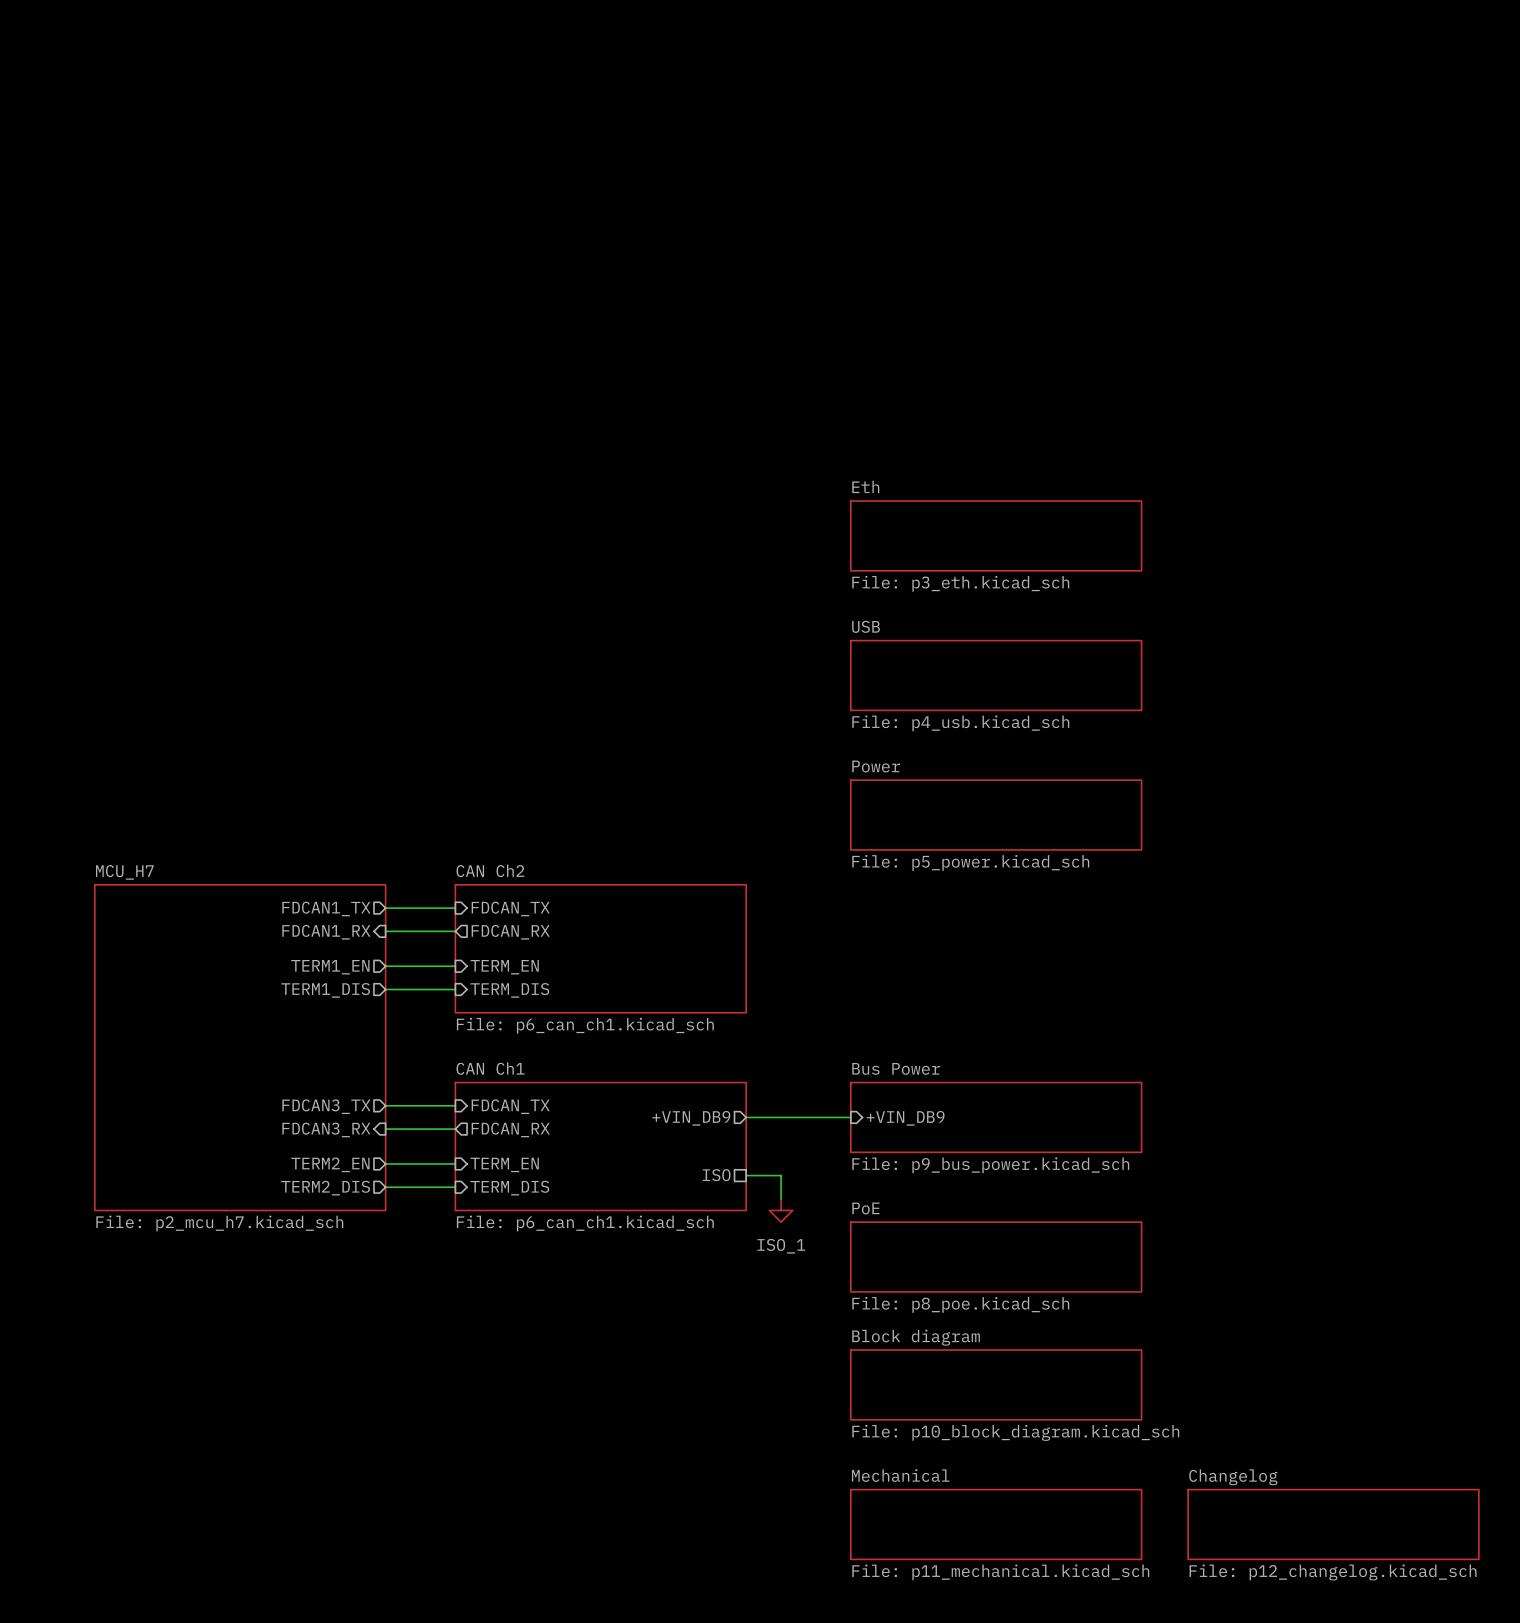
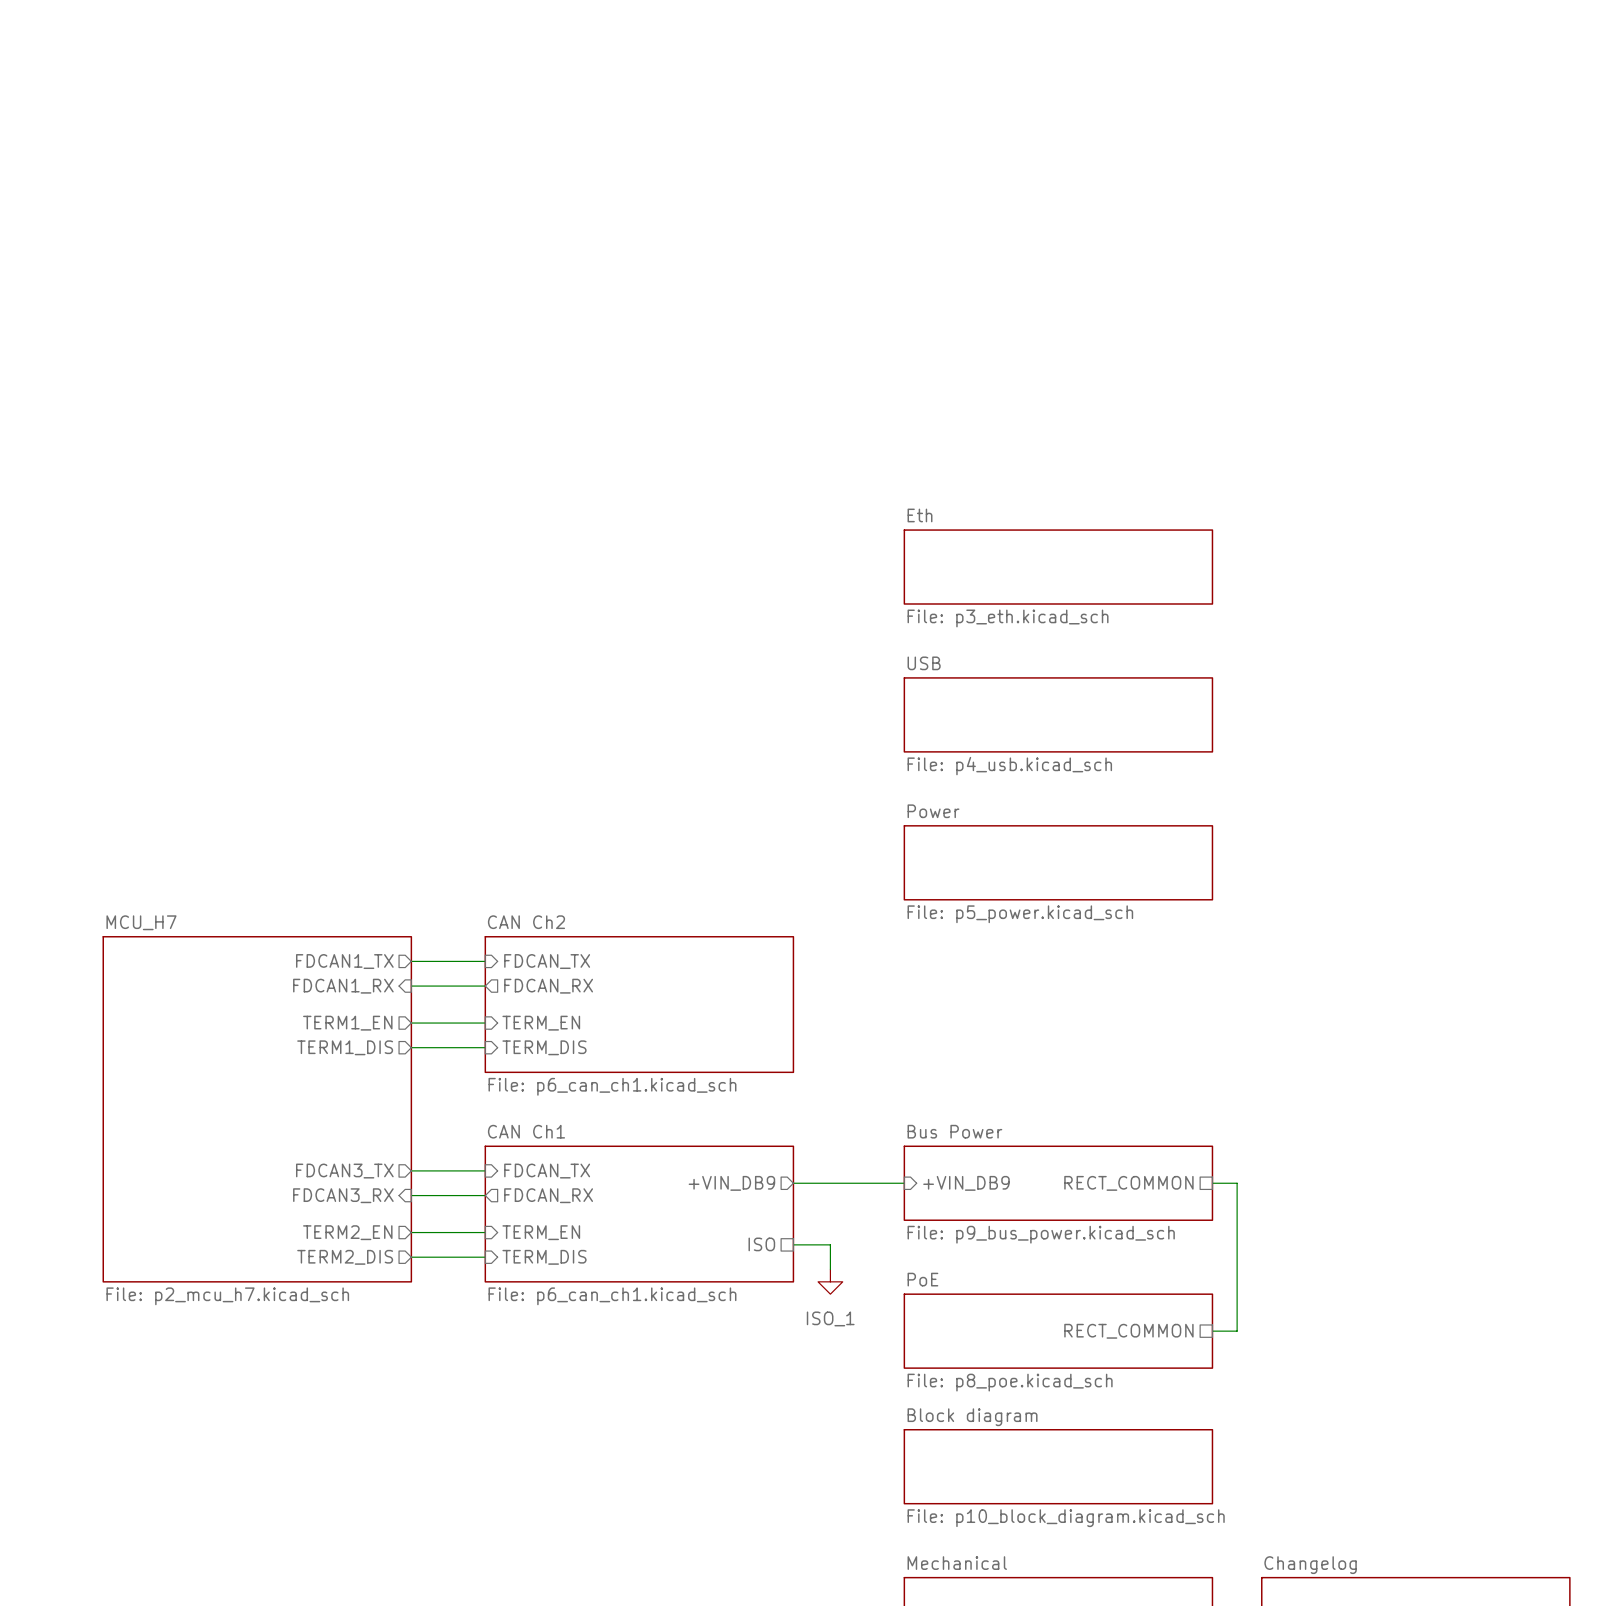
wire: none -> (1212, 1183) (1237, 1183) (1237, 1331) (1212, 1331)
sheet pin: none -> RECT_COMMON (1128, 1183)
sheet pin: none -> RECT_COMMON (1128, 1331)

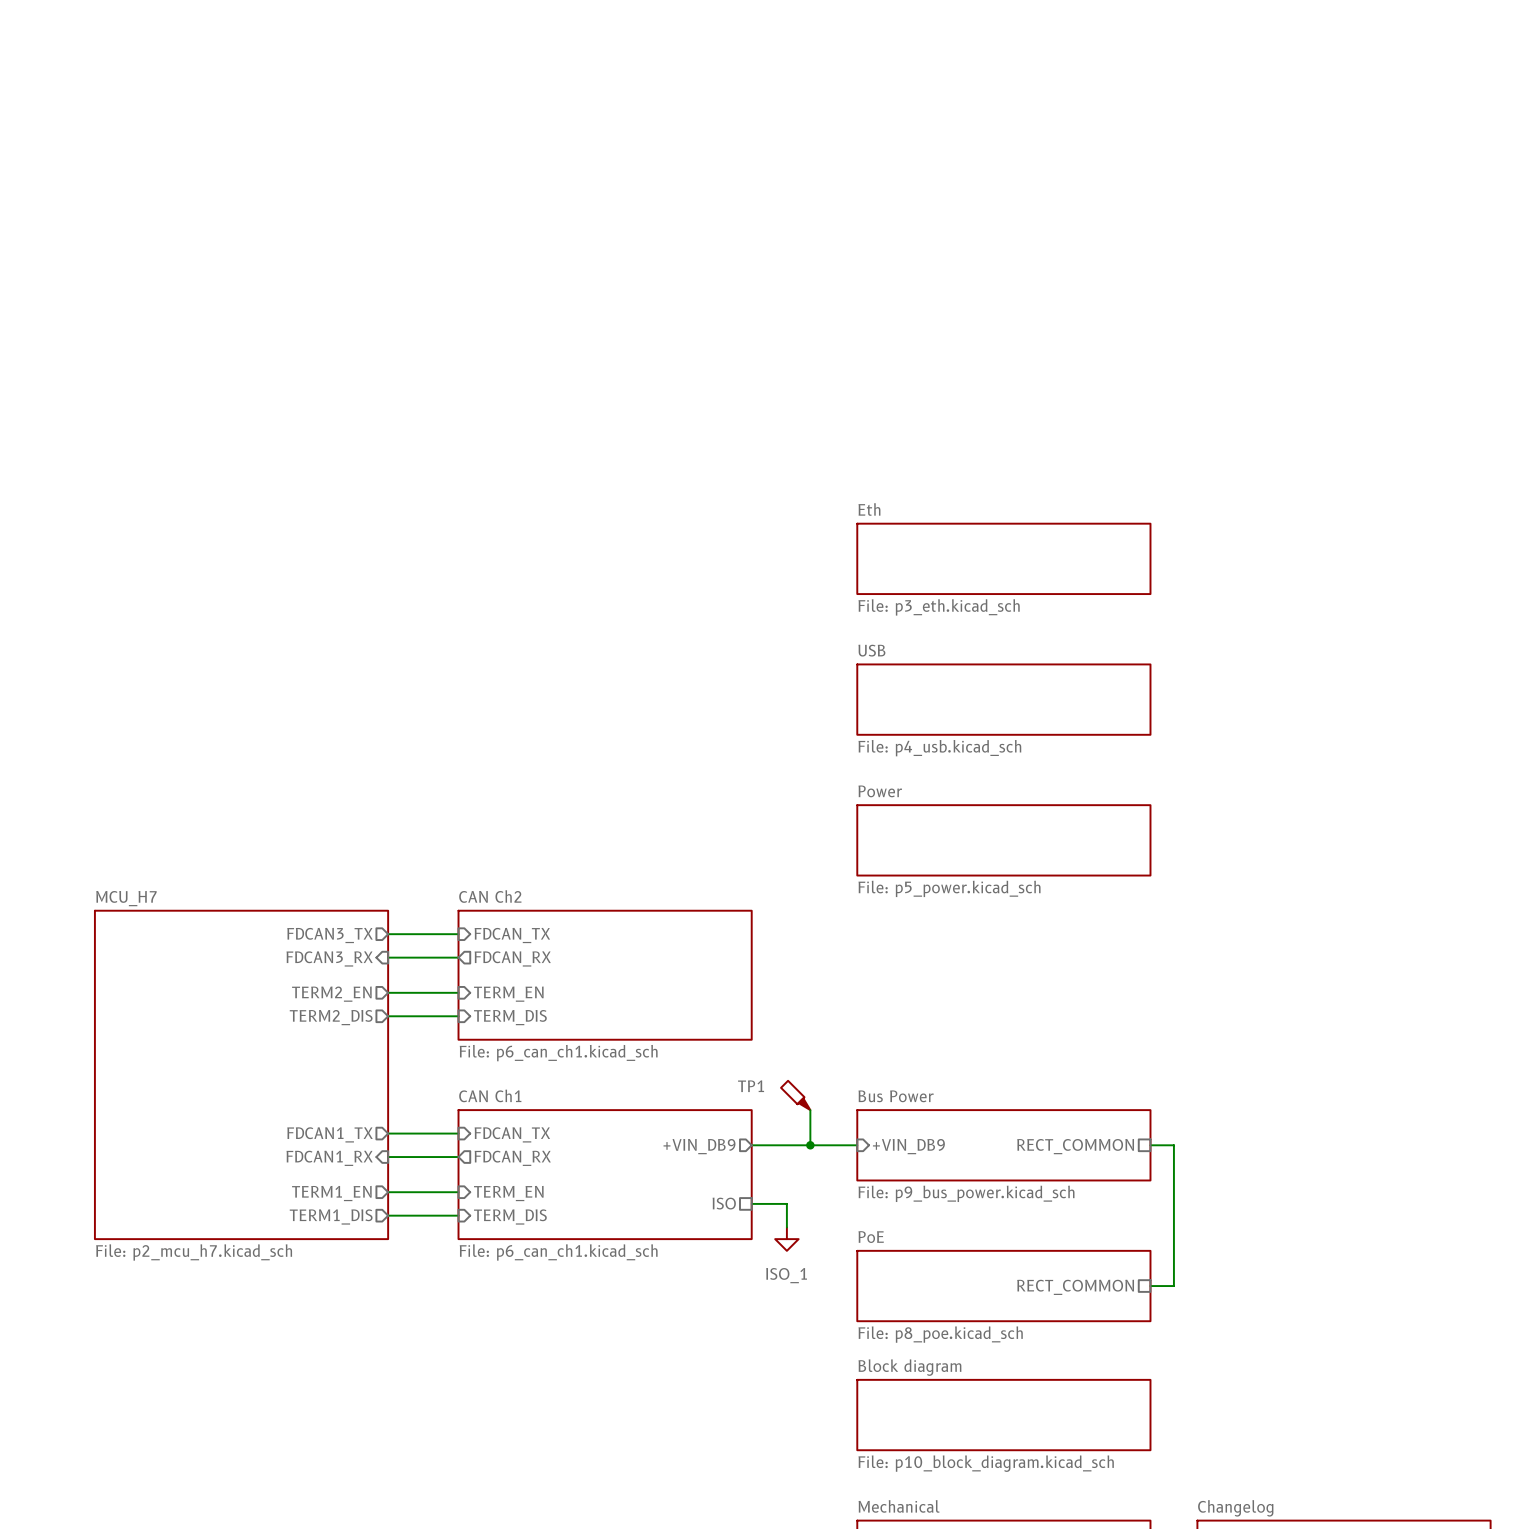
sheet pin: FDCAN1_TX (344, 961) -> FDCAN3_TX (330, 935)
sheet pin: FDCAN1_RX (343, 986) -> FDCAN3_RX (329, 958)
sheet pin: TERM1_EN (347, 1023) -> TERM2_EN (331, 994)
sheet pin: TERM1_DIS (345, 1047) -> TERM2_DIS (331, 1017)
TP1: none -> (795, 1095)
wire: none -> (810, 1110) (810, 1145)
sheet pin: FDCAN3_TX (344, 1171) -> FDCAN1_TX (330, 1134)
junction: none -> (810, 1145)
sheet pin: FDCAN3_RX (343, 1195) -> FDCAN1_RX (329, 1158)
sheet pin: TERM2_EN (347, 1232) -> TERM1_EN (331, 1193)
sheet pin: TERM2_DIS (345, 1257) -> TERM1_DIS (331, 1216)

